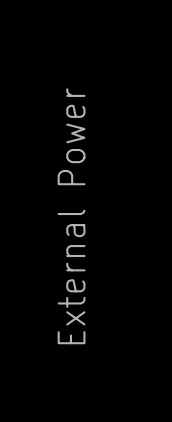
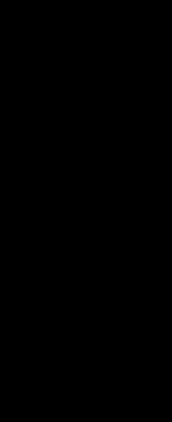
text: External Power (71, 216) -> none

